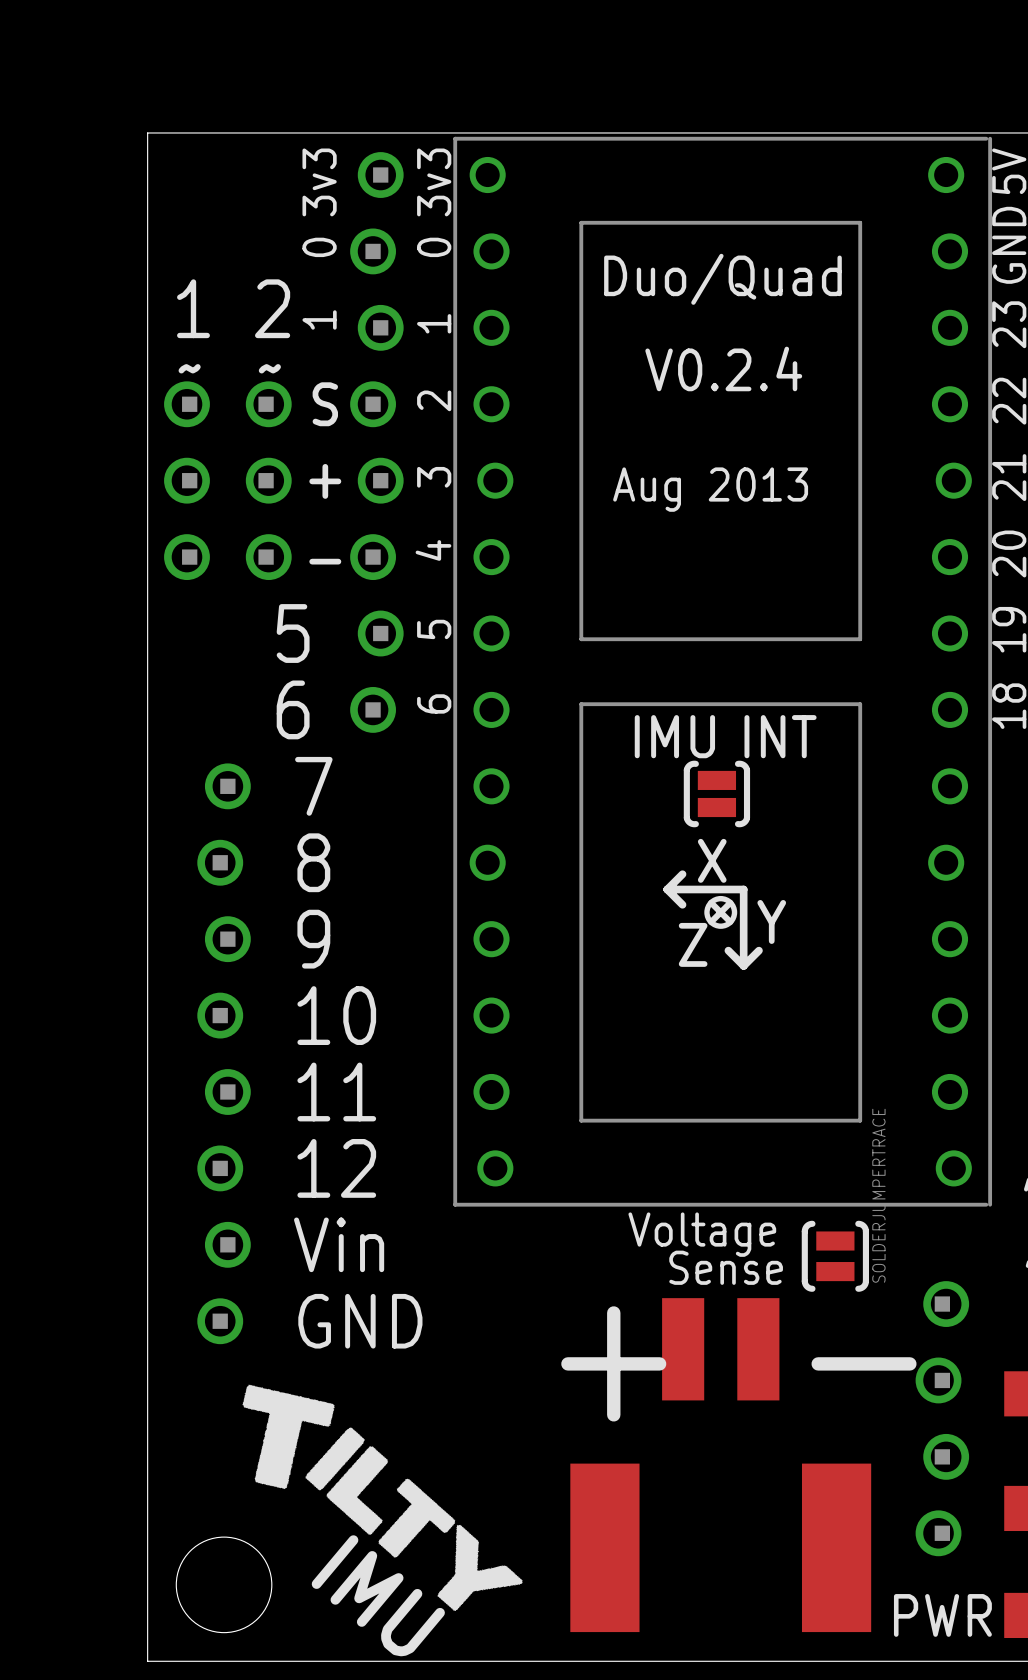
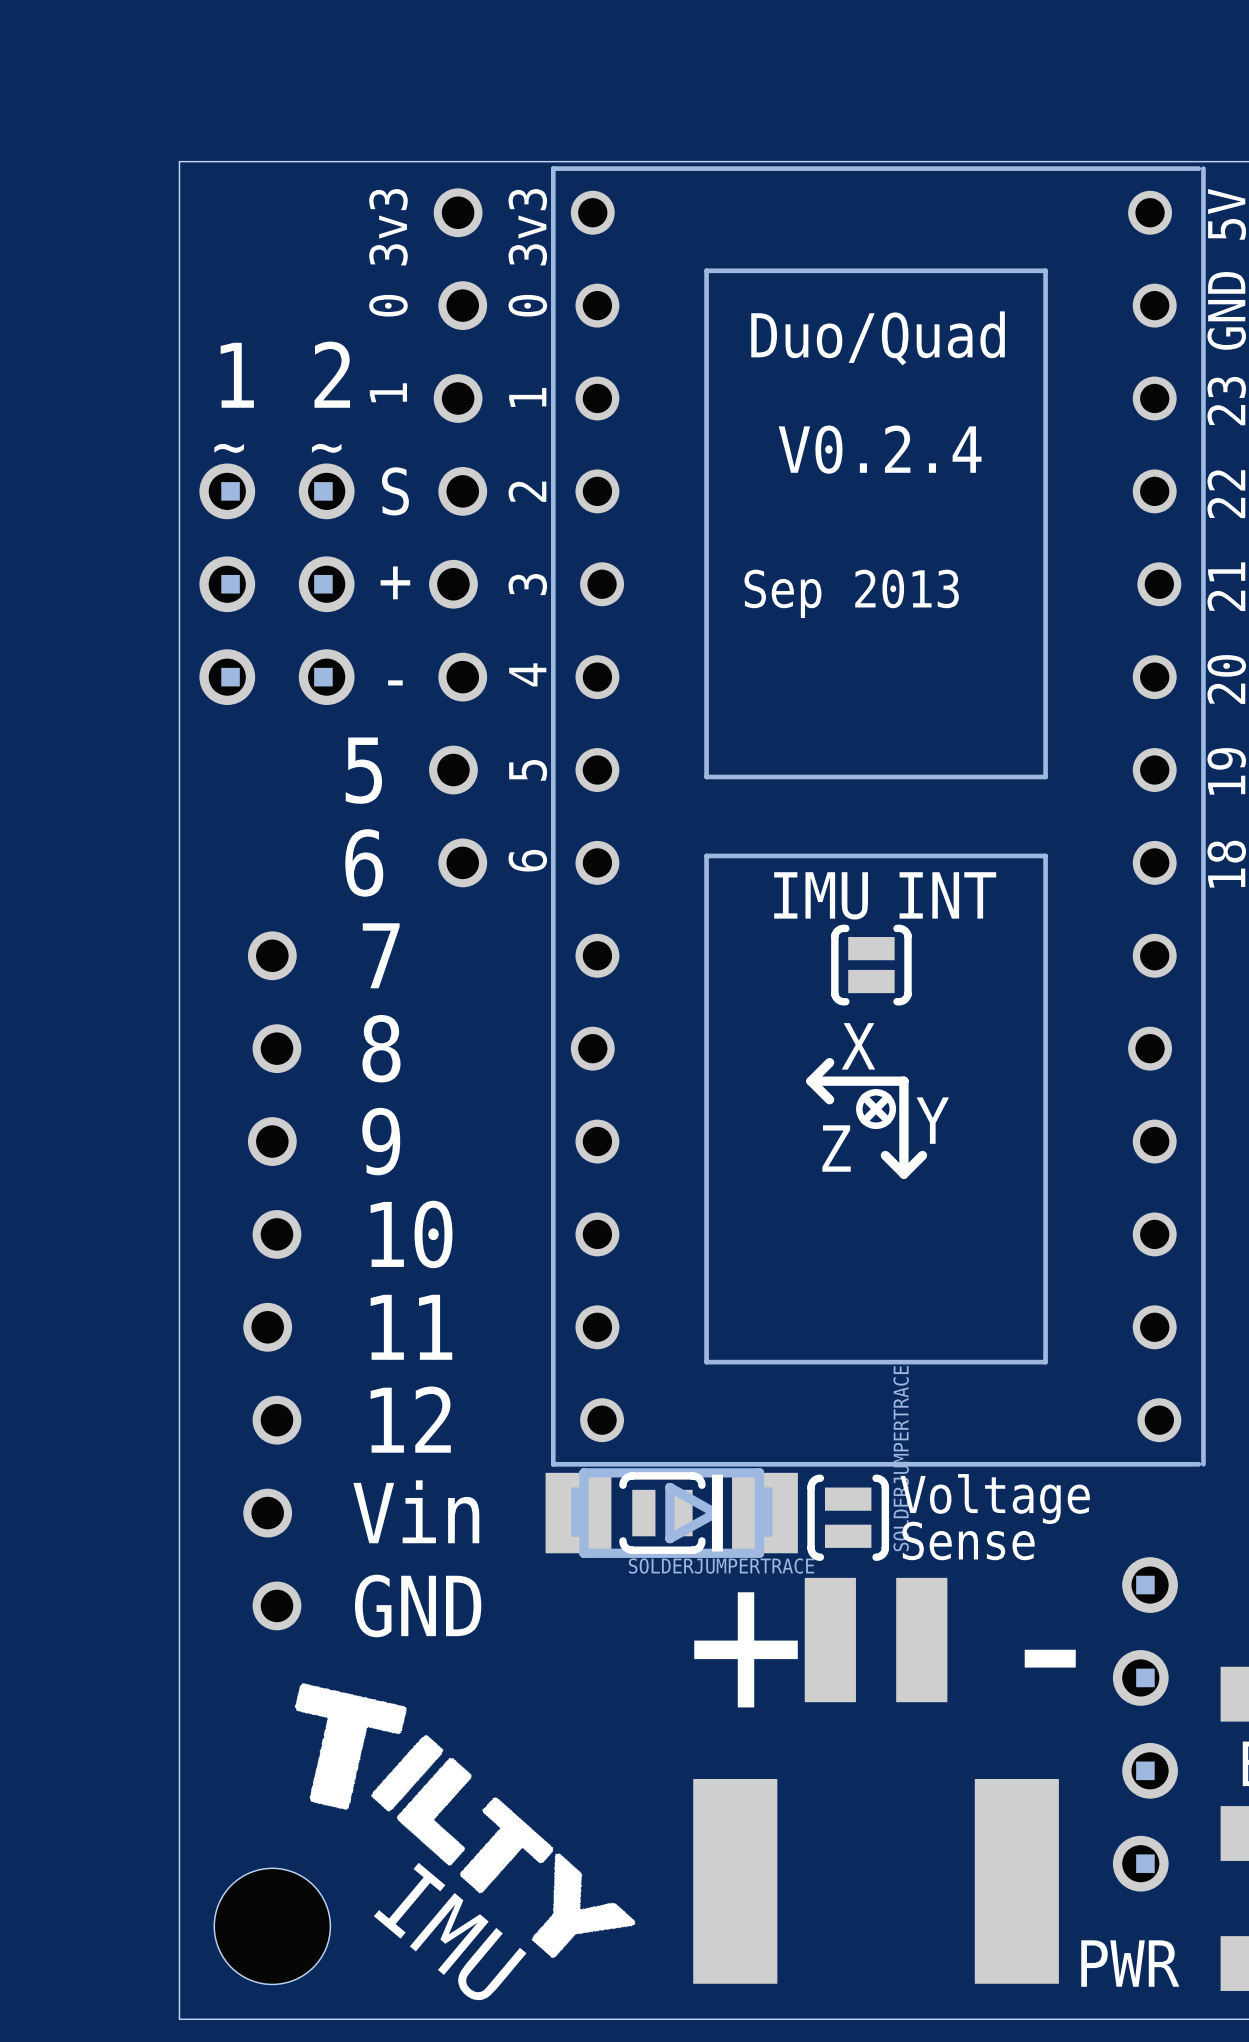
part footprint: [350, 152, 404, 733] -> [429, 188, 488, 888]
text: Aug 2013 (710, 489) -> Sep 2013 (851, 593)
part footprint: [197, 763, 251, 1345] -> [243, 931, 302, 1631]
text position: Voltage (702, 1234) -> Voltage (995, 1499)
part: none -> SOLDERJUMPERTRACE (662, 1513)
part: none -> (671, 1513)
part position: (835, 1256) -> (848, 1517)
text position: Sense (726, 1267) -> Sense (968, 1540)

